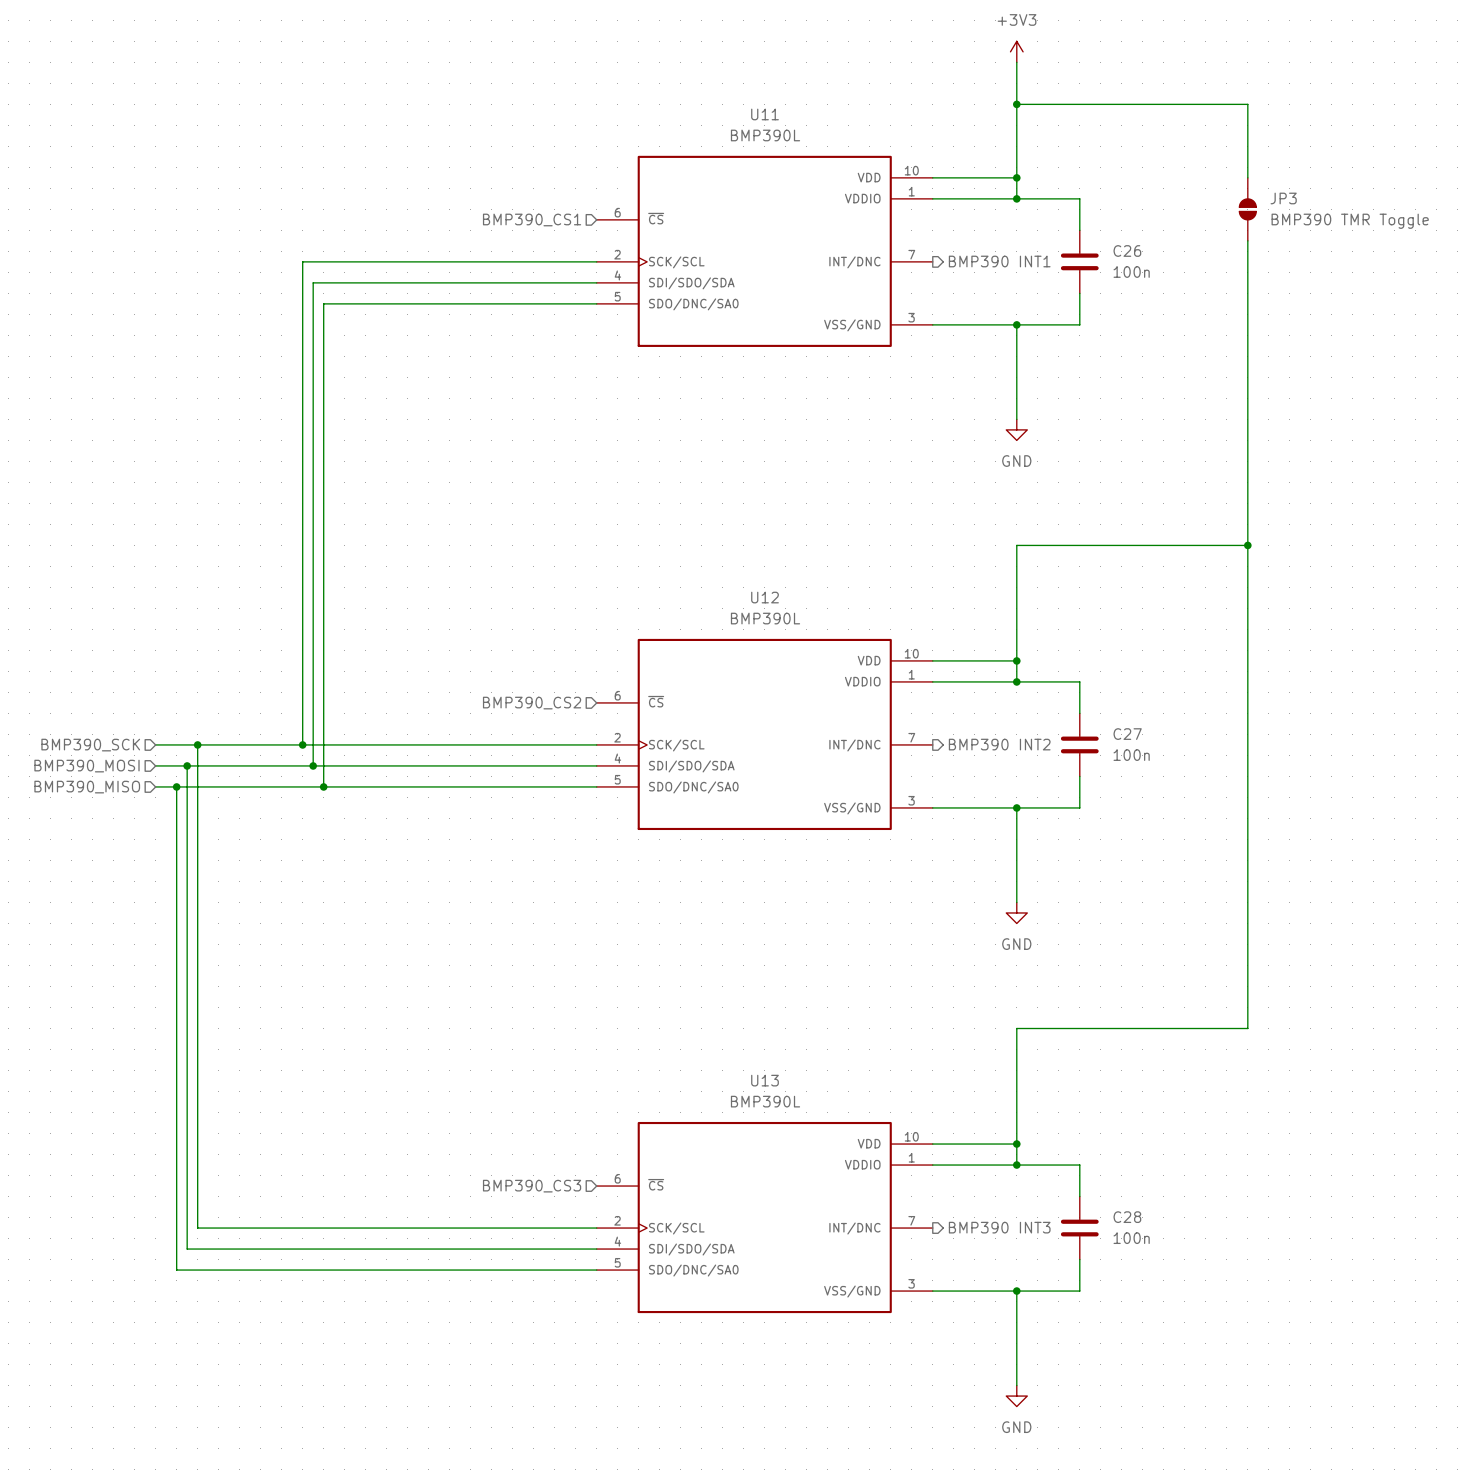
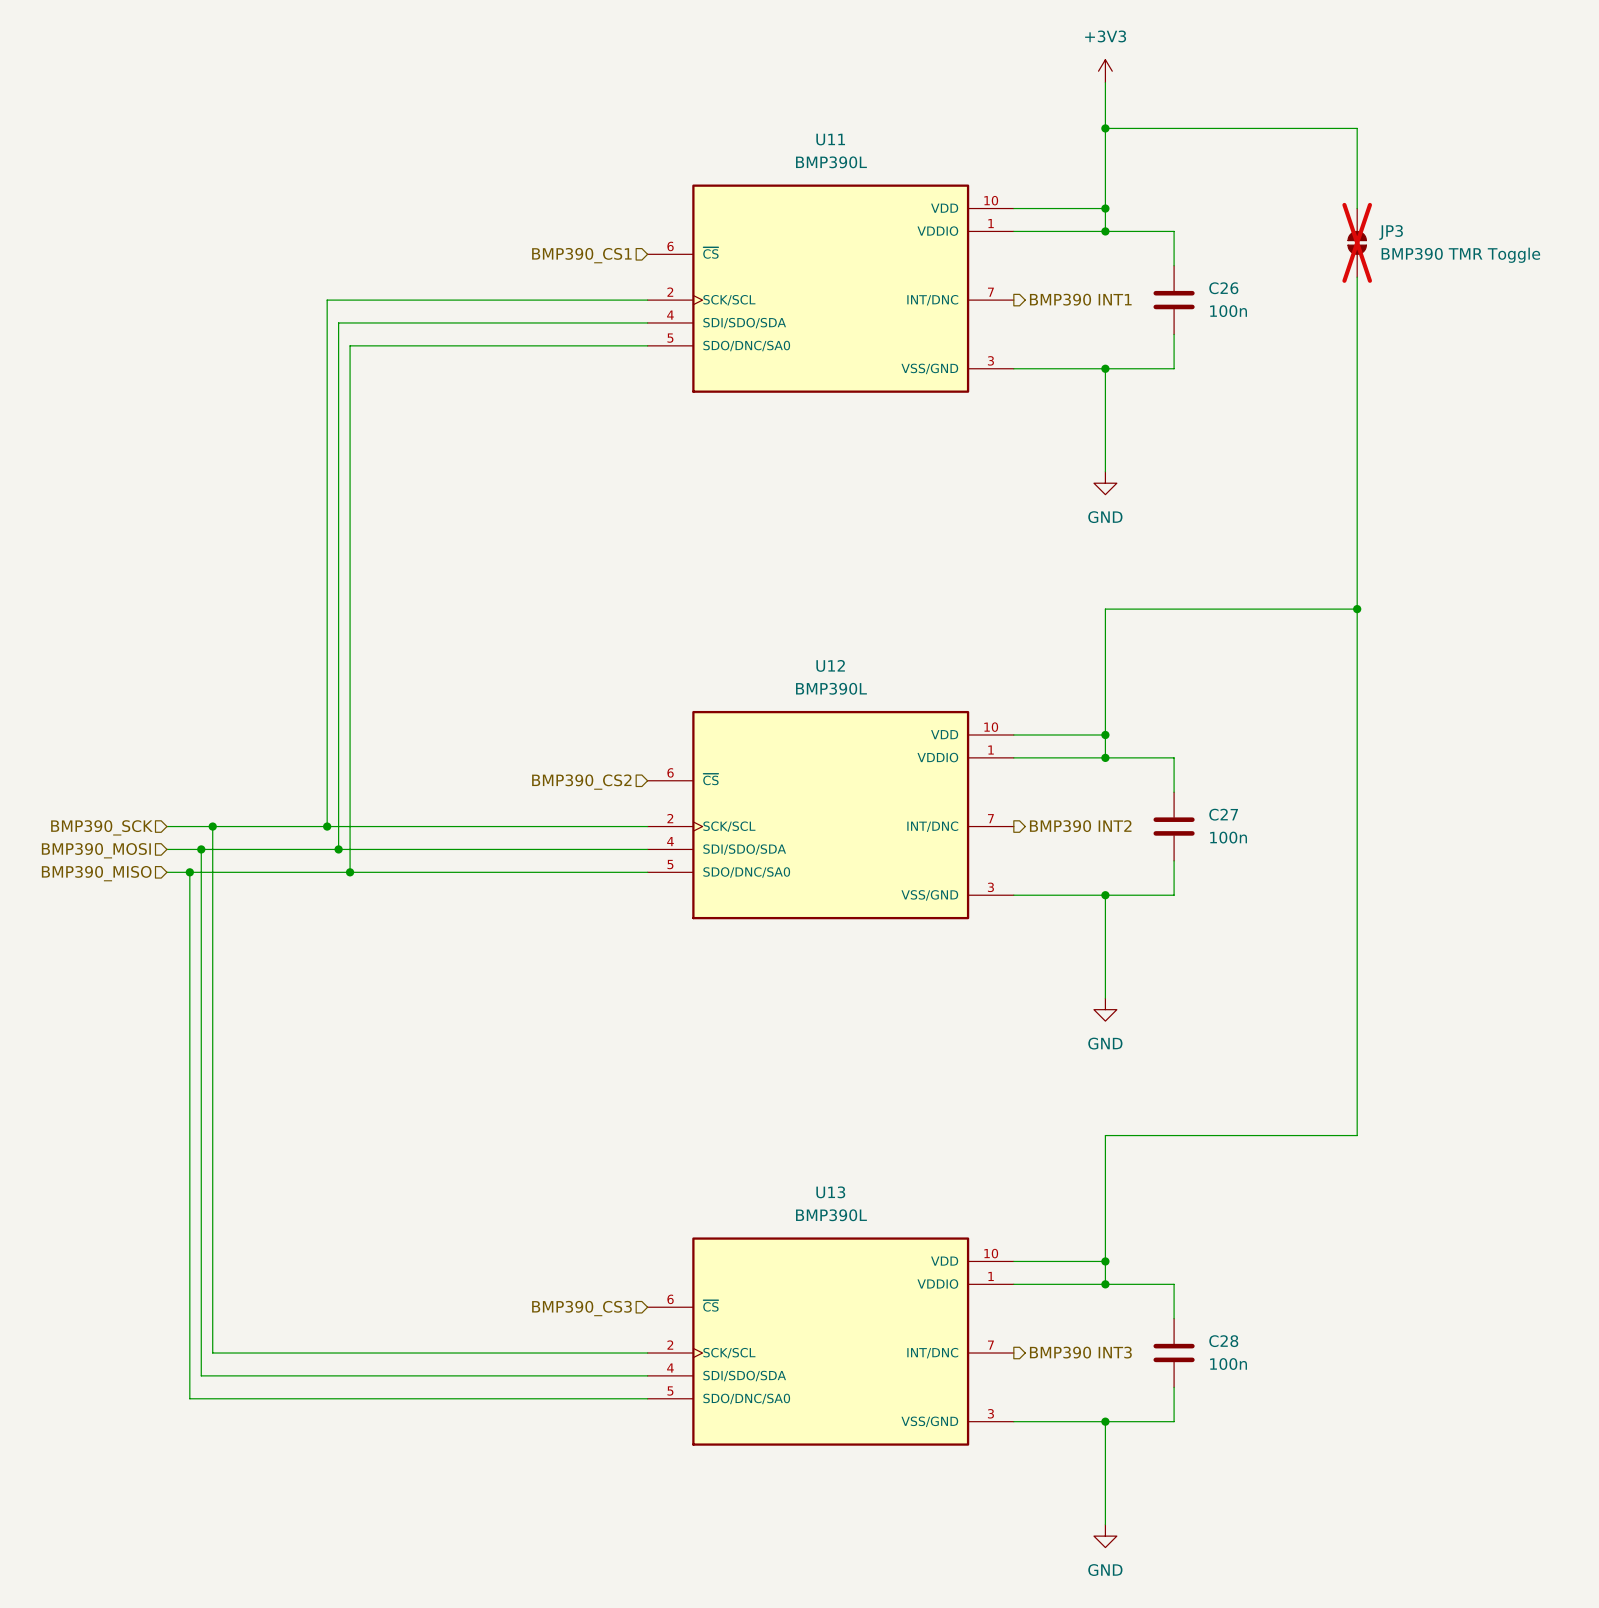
JP3 do-not-place cross: none -> (1357, 242)

